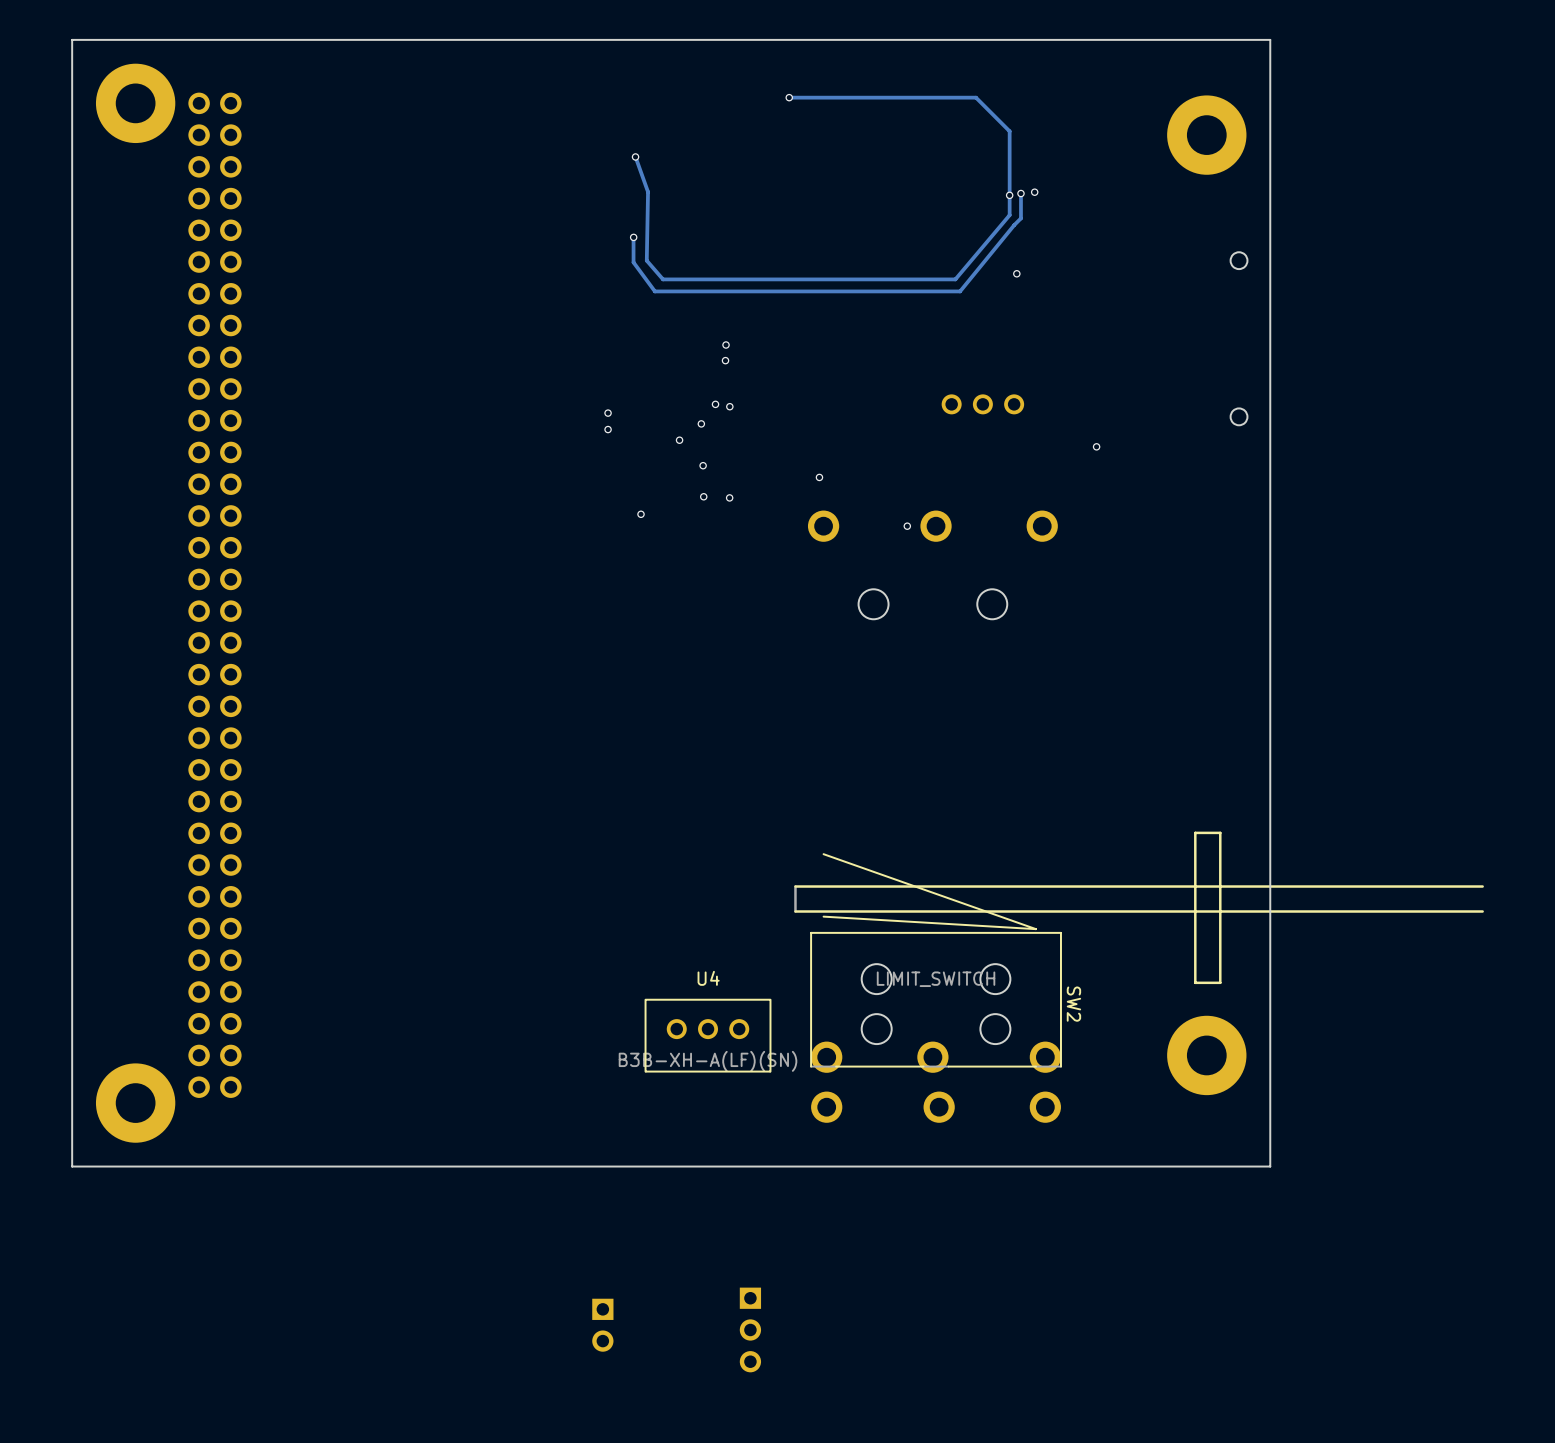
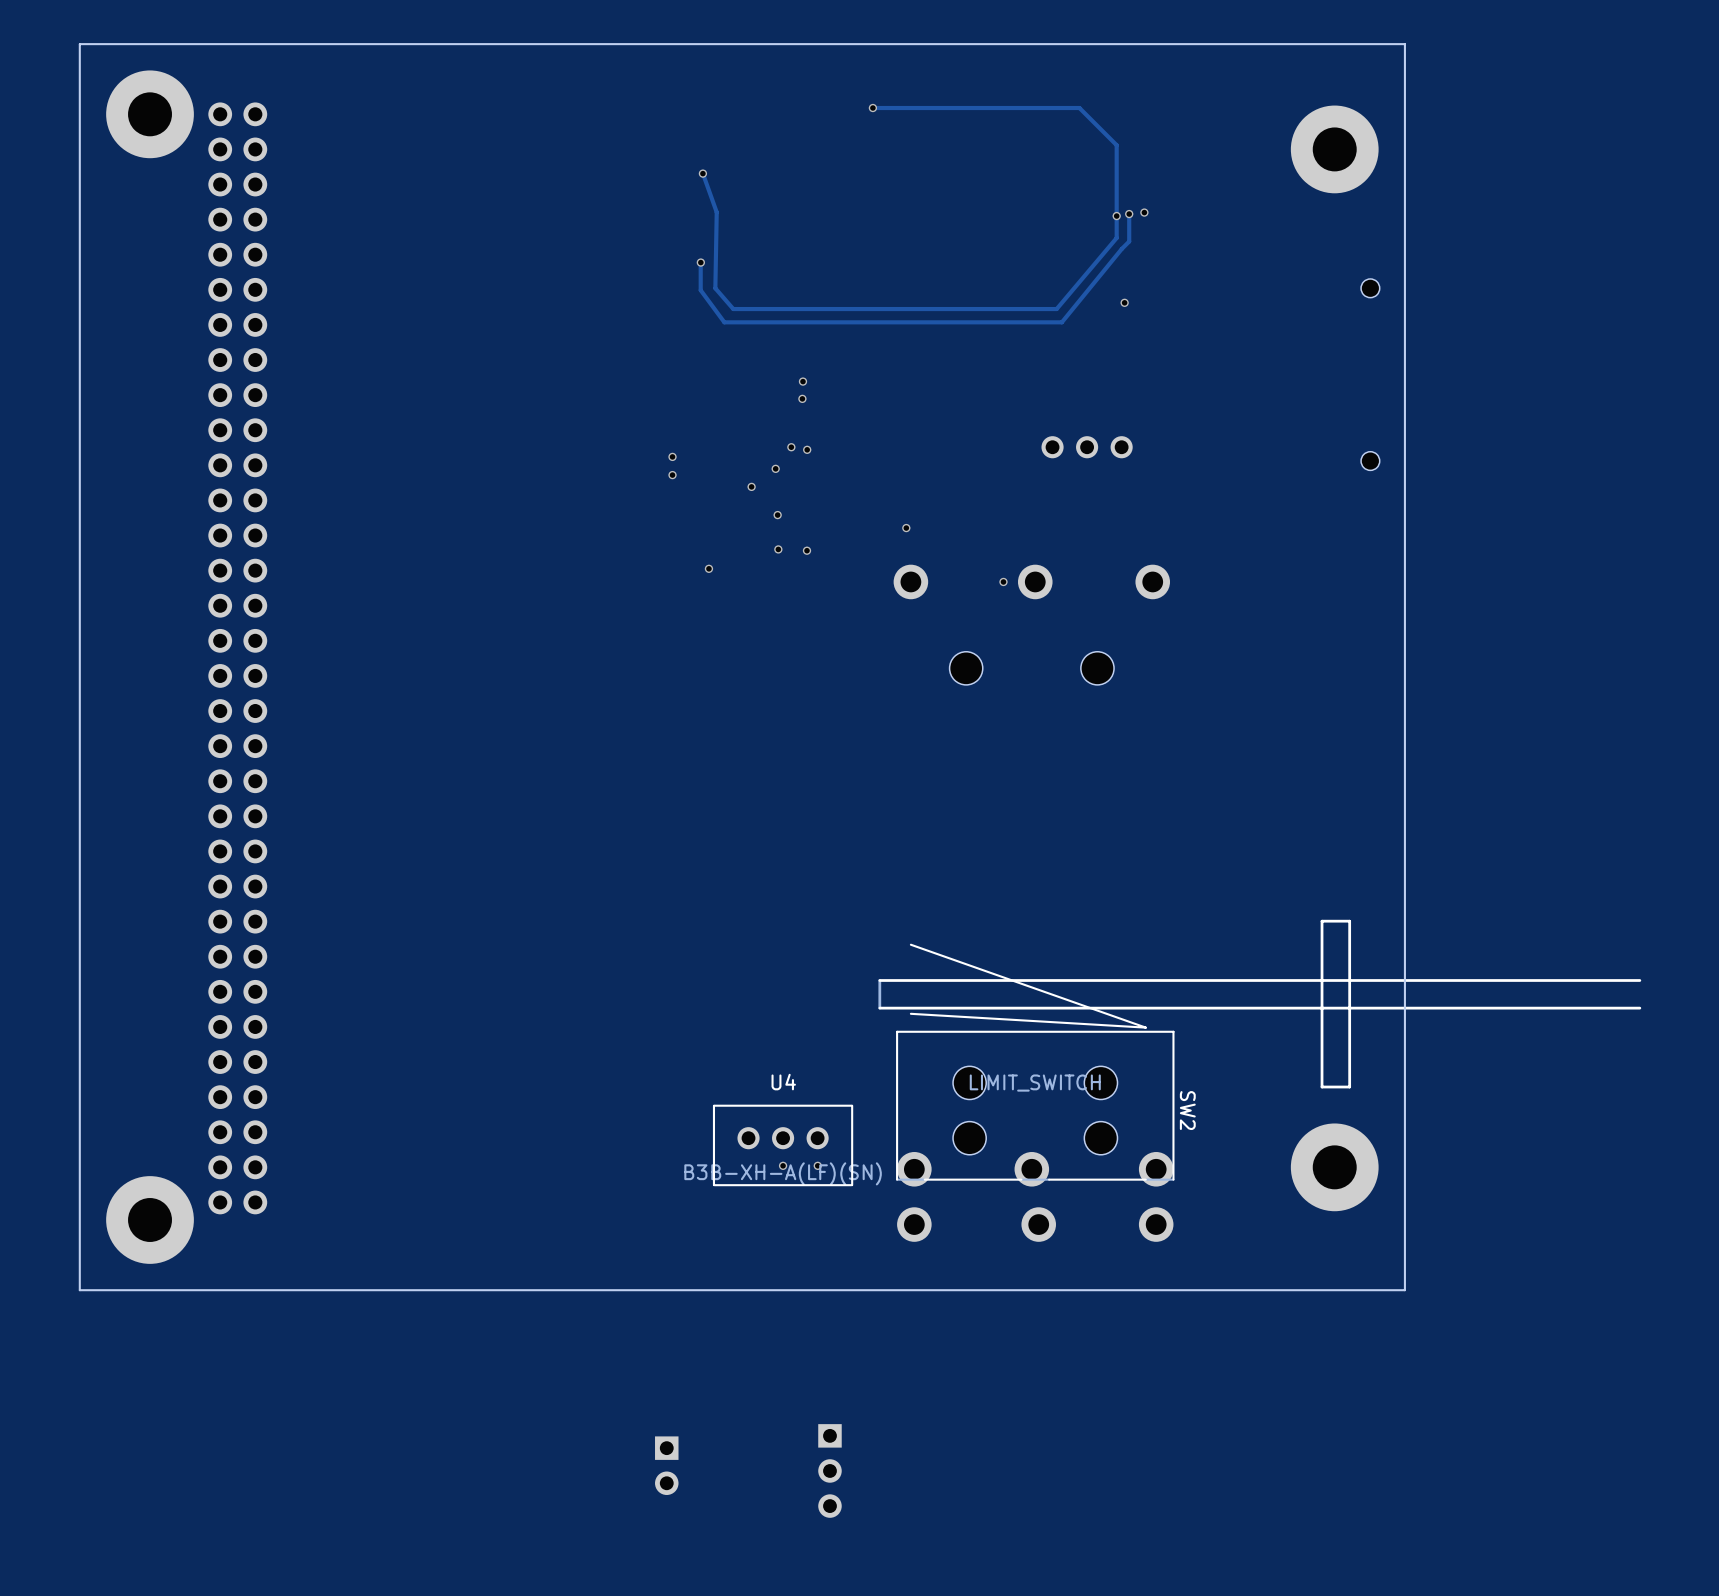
via: (1096, 446) -> none
via: none -> (783, 1165)
via: none -> (817, 1165)

